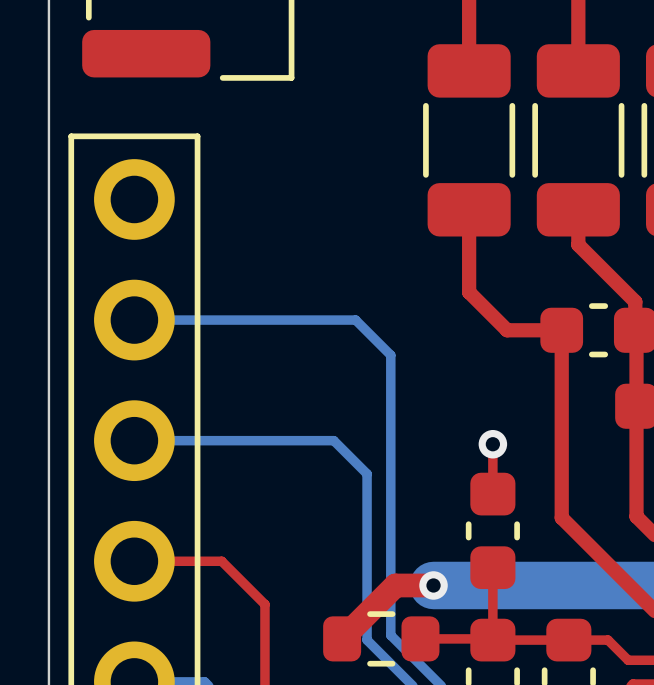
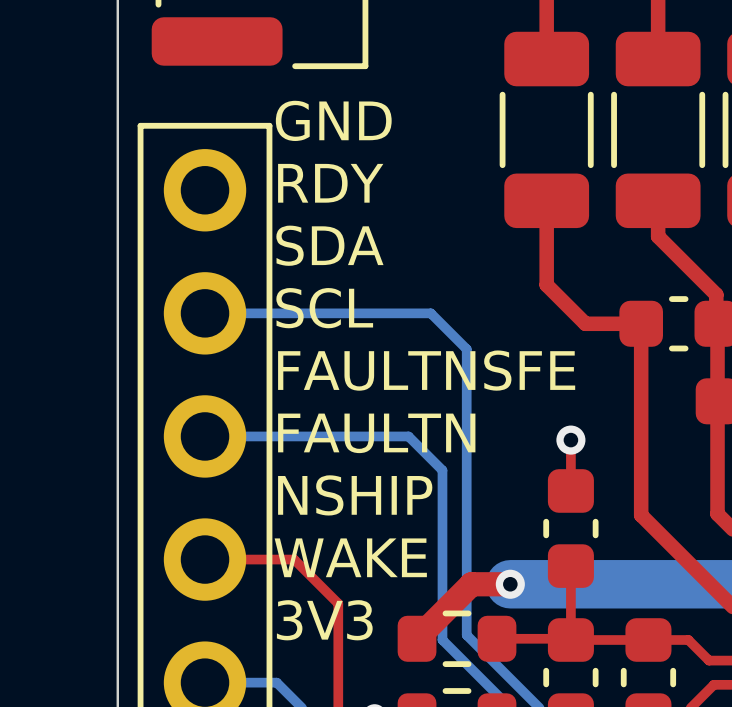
text: none -> GND (333, 120)
text: none -> RDY (330, 183)
text: none -> SDA (329, 245)
text: none -> SCL (324, 308)
text: none -> FAULTNSFE (426, 370)
text: none -> FAULTN (376, 433)
text: none -> NSHIP (355, 495)
text: none -> WAKE (350, 557)
text: none -> 3V3 (324, 620)

